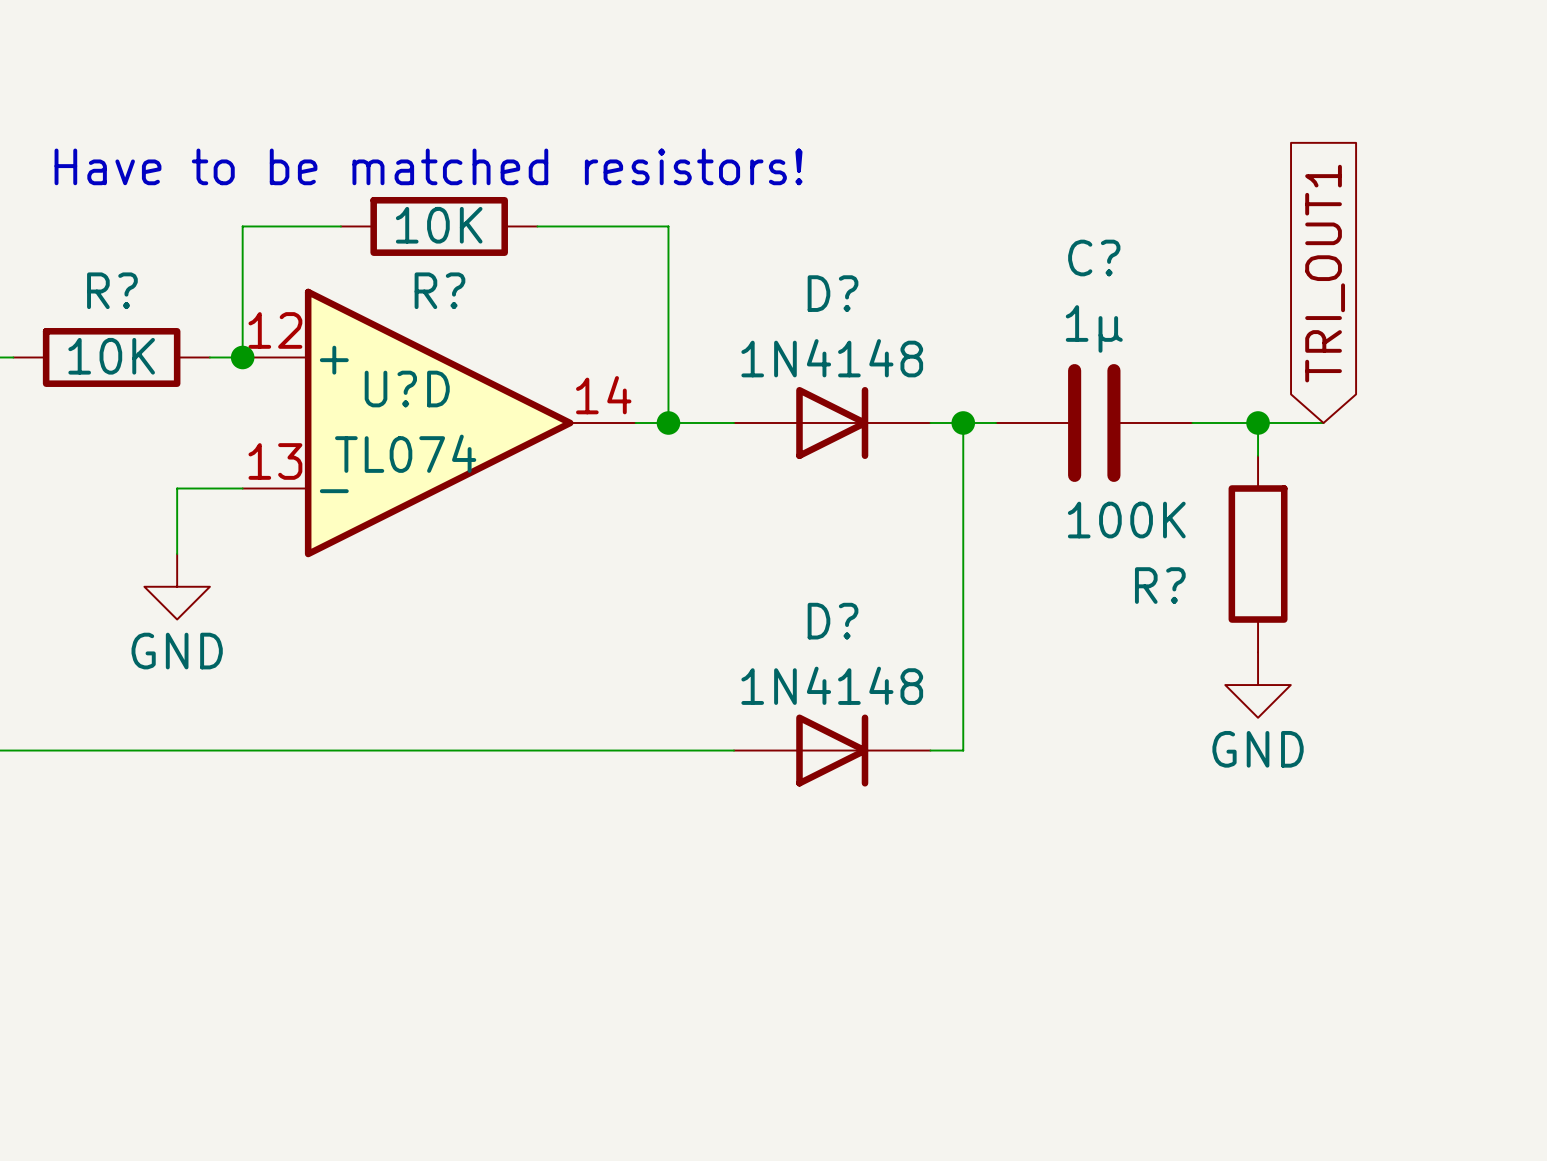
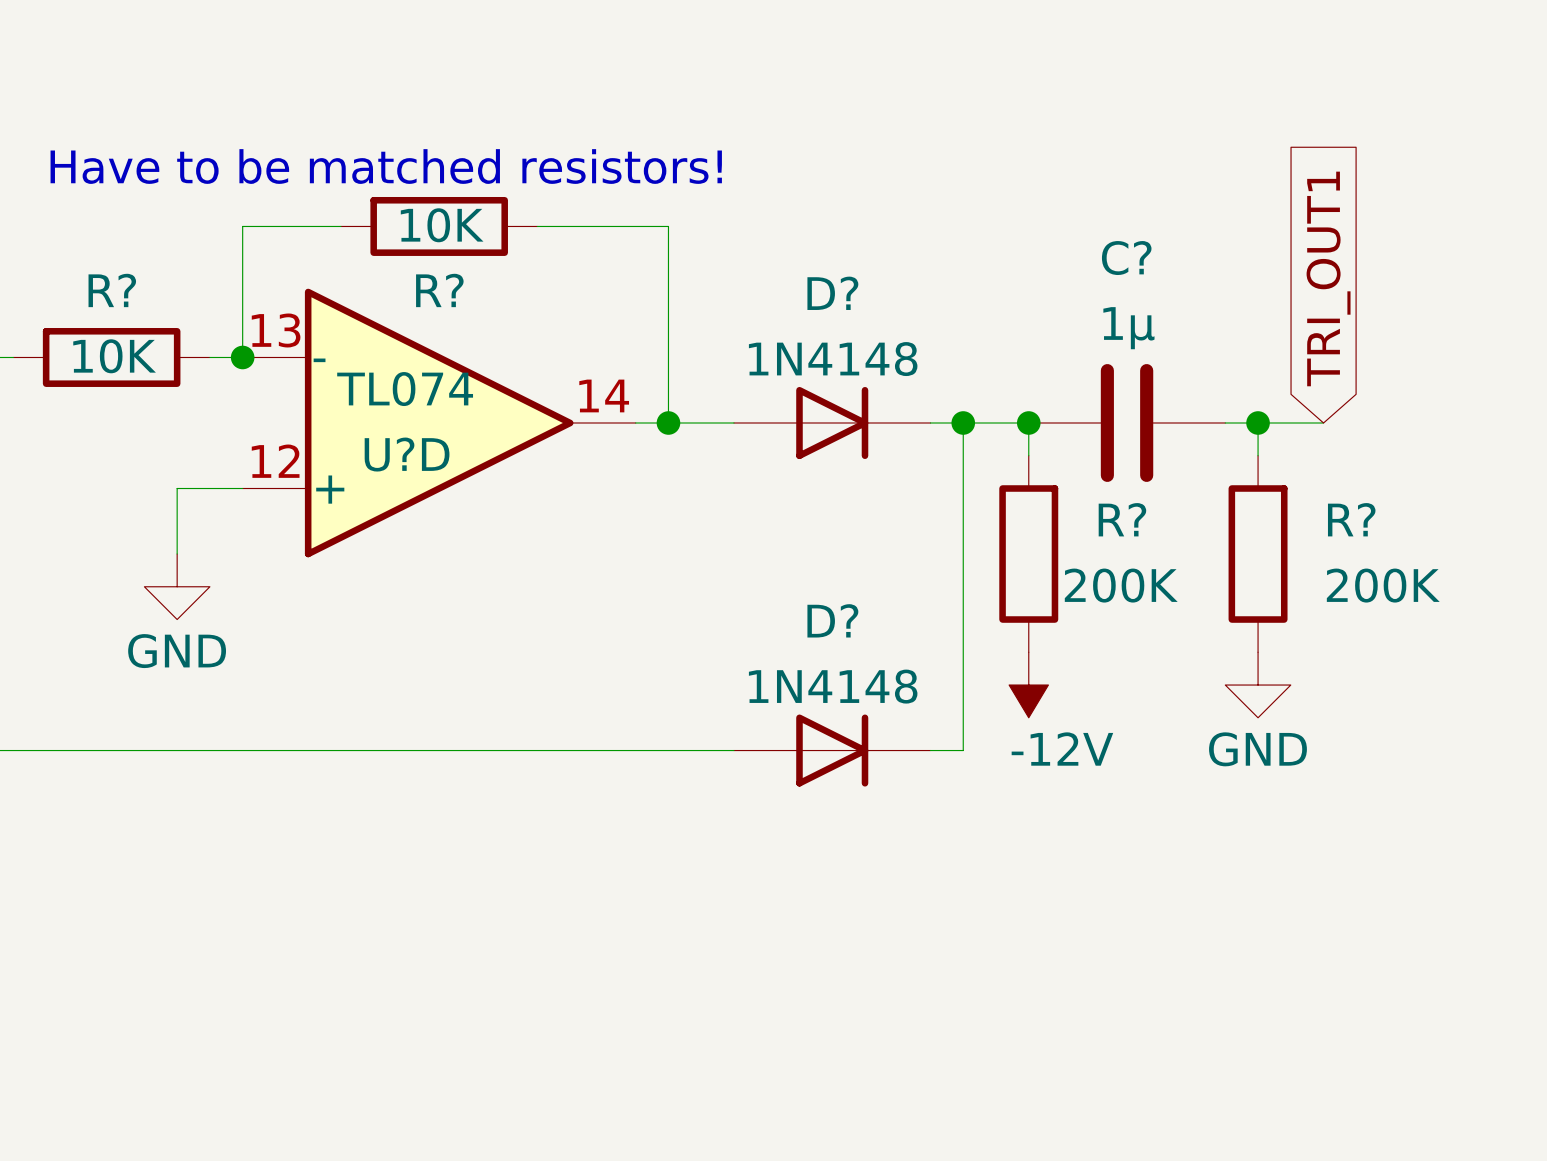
U?D flip: as is (439, 422) -> up-down (439, 422)
wire: none -> (996, 422) (1028, 422) (1028, 455)
junction: none -> (1028, 422)
C? position: (1094, 422) -> (1127, 422)
R? value: 100K (1126, 520) -> 200K (1383, 585)
R?: none -> 200K (1028, 554)
R? name position: R? (1160, 585) -> R? (1351, 519)
power symbol: none -> -12V (1028, 685)

